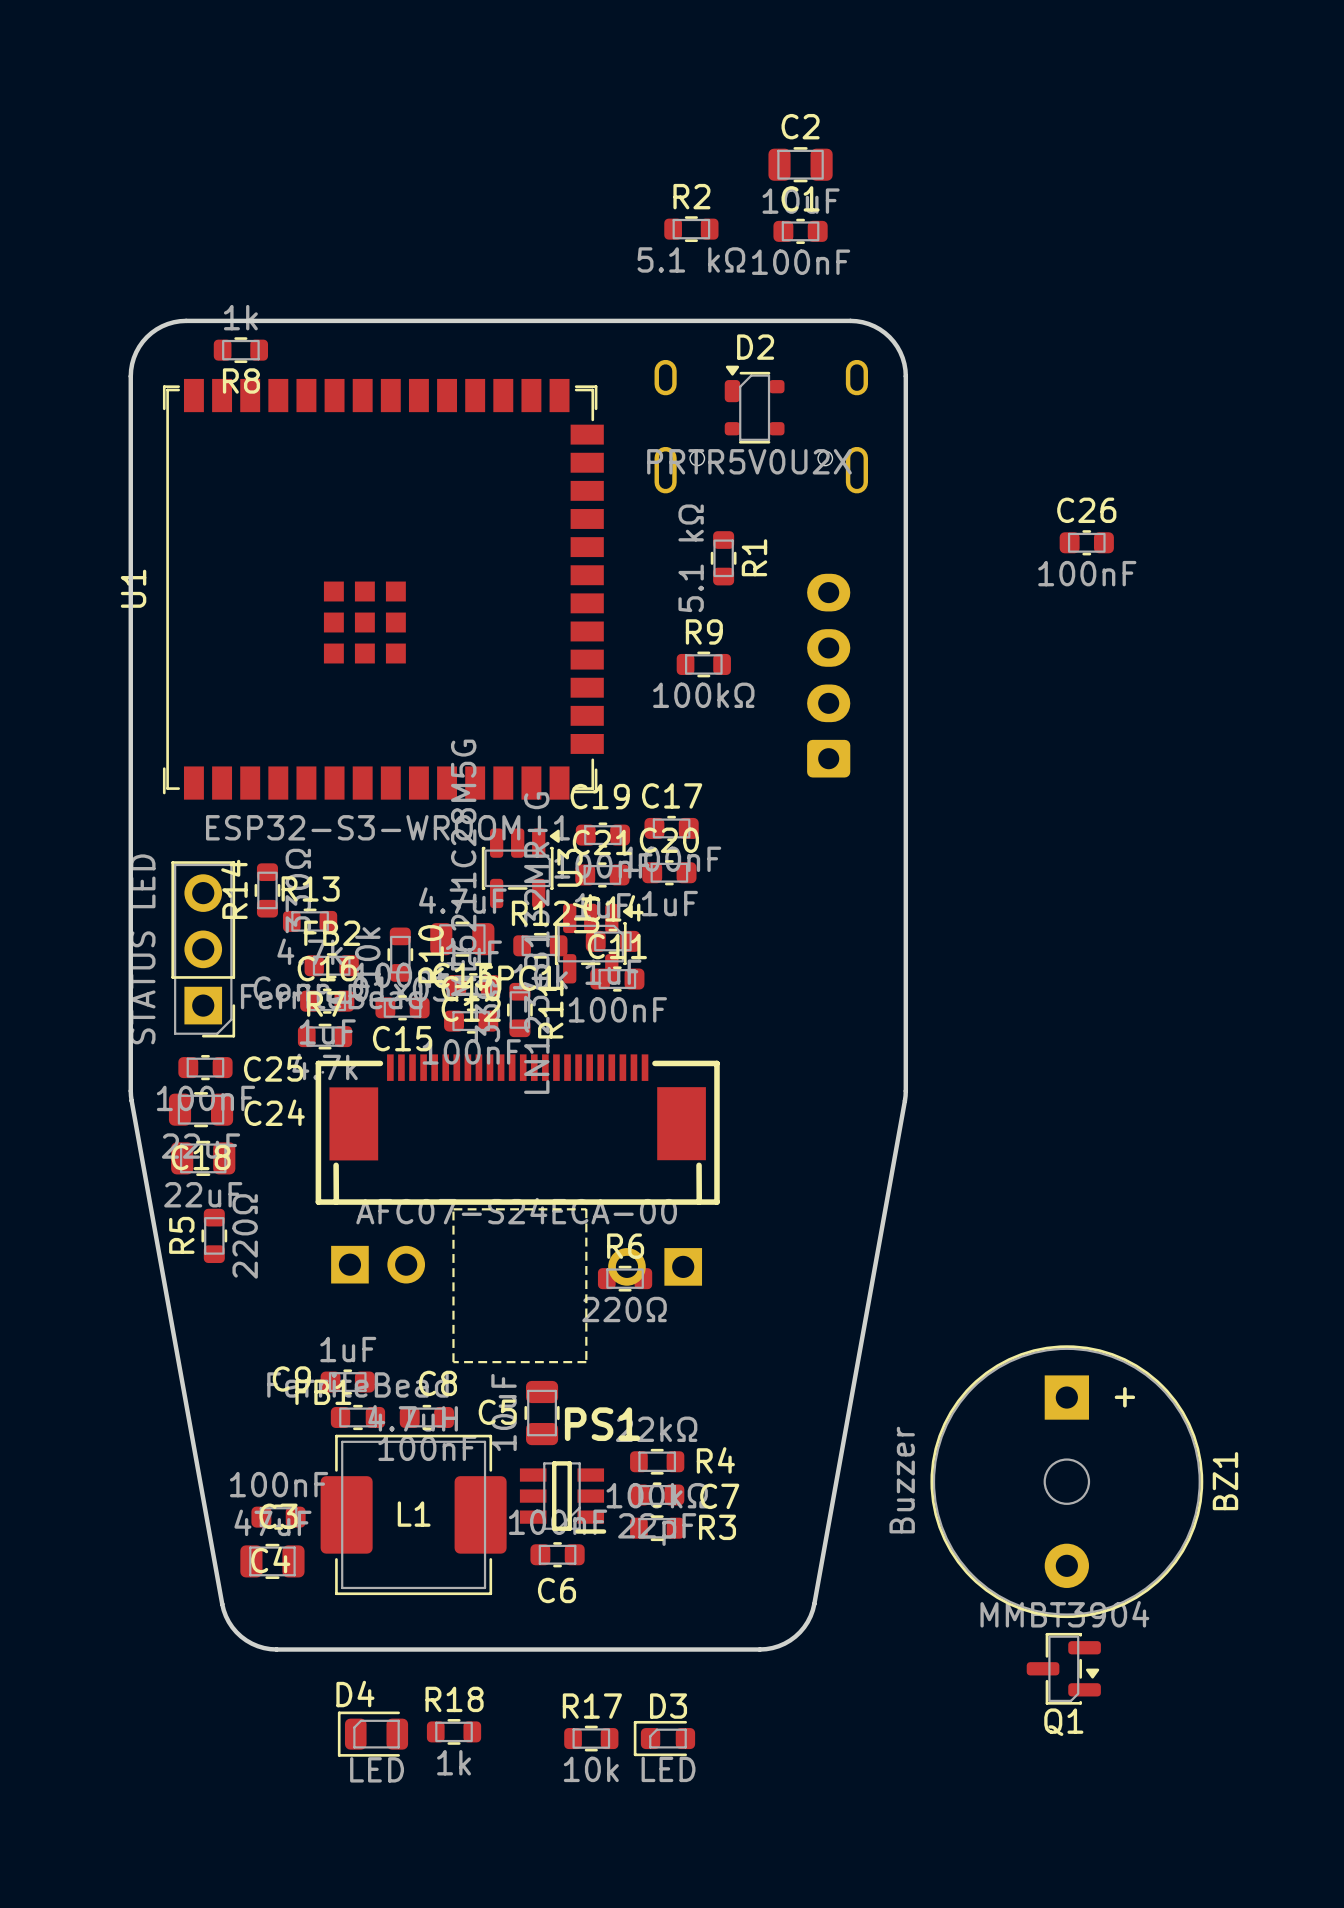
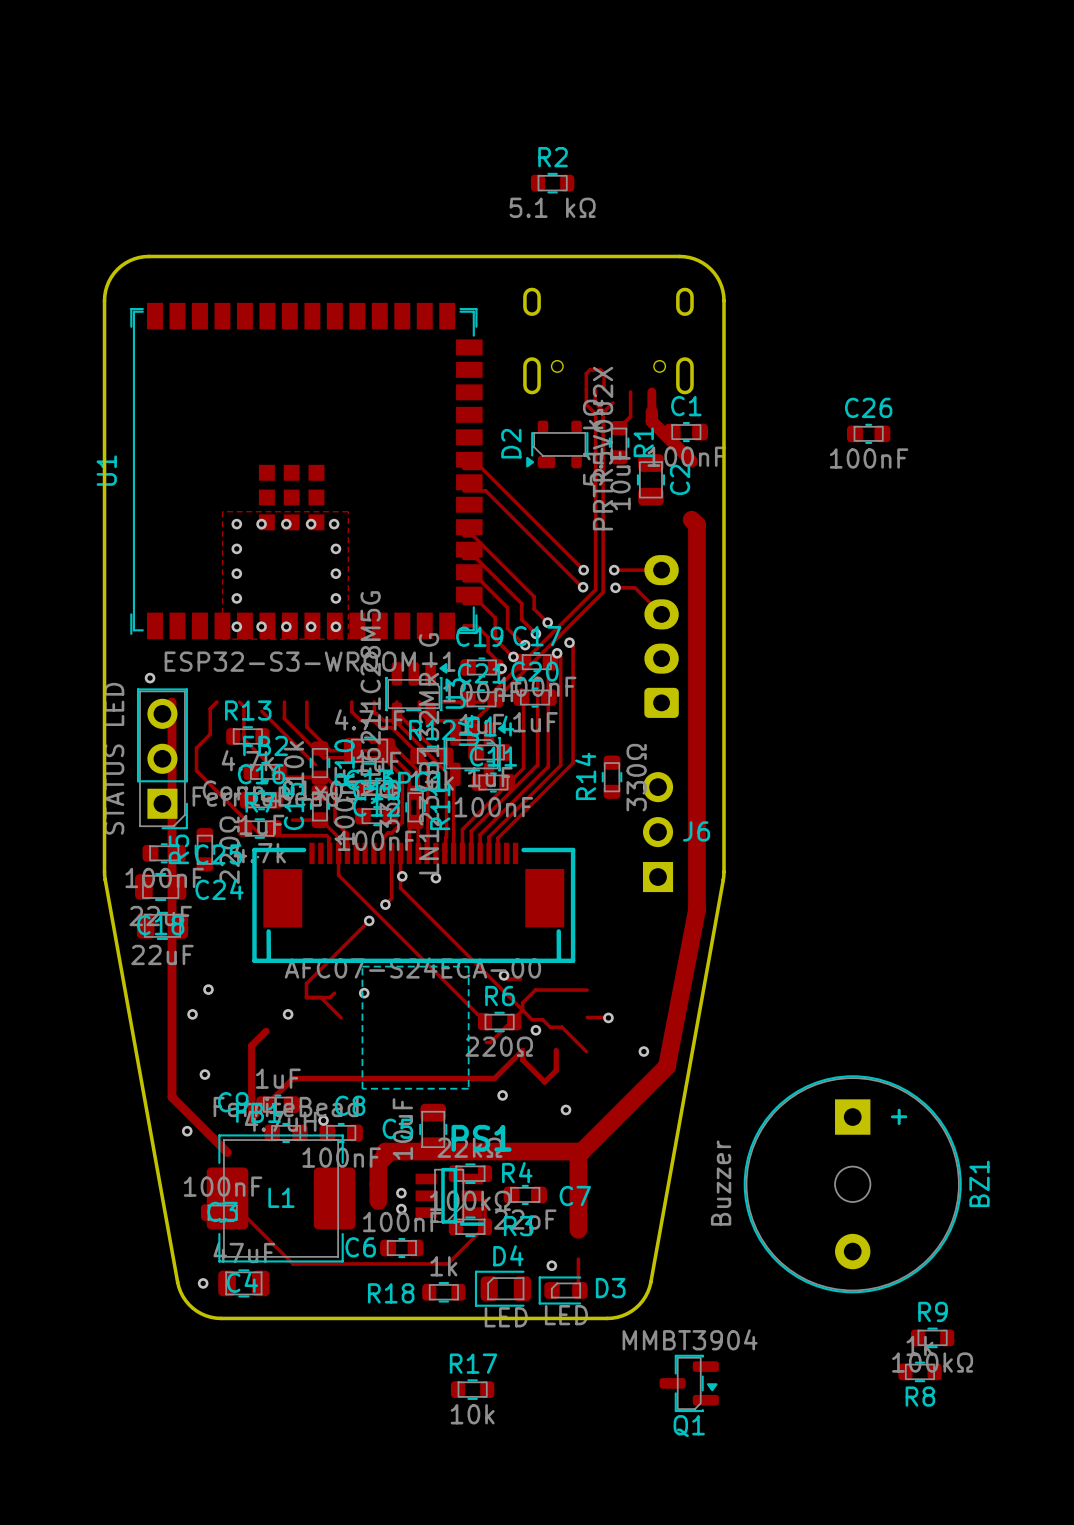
C2 rotation: 0° (800, 164) -> 90° clockwise (650, 479)
C2 position: (800, 164) -> (650, 479)
C1 position: (800, 231) -> (686, 432)
R8 position: (240, 350) -> (919, 1371)
D2 rotation: 0° (754, 404) -> 90° counterclockwise (557, 444)
D2 position: (754, 404) -> (557, 444)
track: none -> (595, 389) (595, 402) (603, 410) (603, 592) (474, 720) (428, 720) (419, 711) (419, 701)
track: none -> (604, 389) (604, 373) (600, 370) (589, 370) (586, 373) (586, 404) (595, 413) (595, 589) (483, 701) (441, 701)
track: none -> (630, 391) (630, 416) (619, 428)
track: none -> (651, 391) (651, 421) (691, 461)
track: none -> (612, 402) (605, 410)
R1 position: (723, 558) -> (619, 442)
track: none -> (463, 468) (482, 468) (583, 570)
track: none -> (463, 490) (485, 490) (583, 587)
zone outline: none -> (222, 511) (348, 511) (348, 639) (222, 639) (222, 511)
track: none -> (691, 519) (696, 525) (696, 909) (666, 1066) (578, 1155) (578, 1229)
via: none -> (236, 524)
via: none -> (261, 524)
via: none -> (286, 524)
via: none -> (311, 524)
via: none -> (334, 524)
R9 position: (703, 664) -> (932, 1337)
track: none -> (463, 535) (473, 535) (534, 596) (534, 609) (547, 622)
part position: (828, 675) -> (661, 636)
via: none -> (236, 548)
via: none -> (335, 548)
track: none -> (463, 558) (476, 558) (521, 603) (521, 619) (535, 633)
via: none -> (583, 570)
track: none -> (614, 570) (661, 570)
via: none -> (614, 570)
via: none -> (236, 573)
via: none -> (335, 573)
track: none -> (463, 580) (480, 580) (507, 607) (507, 628) (525, 645)
via: none -> (583, 587)
track: none -> (615, 587) (635, 587) (661, 614)
via: none -> (615, 587)
via: none -> (236, 598)
via: none -> (335, 598)
track: none -> (463, 603) (480, 603) (495, 617) (495, 639) (513, 656)
via: none -> (547, 622)
track: none -> (463, 625) (476, 625) (488, 637) (488, 651) (501, 665) (501, 668)
via: none -> (236, 626)
via: none -> (261, 626)
via: none -> (286, 626)
via: none -> (311, 626)
via: none -> (335, 626)
via: none -> (535, 633)
track: none -> (569, 642) (573, 646) (573, 763) (497, 838) (497, 853)
via: none -> (569, 642)
via: none -> (525, 645)
track: none -> (557, 653) (560, 656) (560, 765) (489, 837) (489, 853)
via: none -> (557, 653)
via: none -> (513, 656)
via: none -> (501, 668)
track: none -> (548, 668) (548, 766) (480, 834) (480, 853)
via: none -> (150, 678)
track: none -> (536, 677) (537, 764) (471, 831) (471, 853)
track: none -> (521, 689) (523, 691) (523, 768) (462, 829) (462, 853)
track: none -> (172, 701) (172, 1097) (227, 1152)
track: none -> (216, 701) (210, 708) (210, 734) (196, 748) (196, 770) (261, 835) (326, 835) (328, 837) (329, 853)
track: none -> (239, 701) (243, 706) (243, 739) (281, 777) (326, 777) (335, 786) (335, 821) (347, 833) (347, 853)
track: none -> (284, 701) (284, 718) (323, 757) (383, 757) (402, 776) (402, 822) (382, 838) (382, 853)
track: none -> (306, 701) (306, 727) (330, 750) (386, 750) (409, 773) (409, 853)
track: none -> (351, 701) (351, 711) (360, 720) (373, 720) (380, 727) (391, 727) (427, 763) (427, 853)
track: none -> (374, 701) (374, 713) (383, 720) (394, 720) (446, 772) (444, 853)
track: none -> (396, 701) (396, 712) (453, 769) (453, 853)
R14 position: (267, 890) -> (612, 777)
track: none -> (261, 711) (315, 764)
track: none -> (366, 736) (371, 741) (389, 741) (418, 771) (418, 853)
C15 rotation: 0° (402, 1007) -> 90° clockwise (319, 806)
track: none -> (292, 820) (321, 820) (338, 837) (338, 875) (477, 1014) (486, 1014)
J6: none -> (658, 832)
track: none -> (391, 853) (391, 898) (385, 904)
track: none -> (400, 853) (400, 888) (532, 1019) (542, 1019) (550, 1027) (562, 1027) (586, 1051)
via: none -> (402, 876)
via: none -> (435, 878)
via: none -> (385, 904)
track: none -> (369, 920) (306, 983) (306, 997) (330, 997) (334, 993)
via: none -> (369, 920)
track: none -> (504, 975) (507, 978) (520, 978)
via: none -> (504, 975)
R5 position: (214, 1235) -> (204, 849)
via: none -> (208, 989)
track: none -> (587, 990) (535, 990) (522, 1002) (522, 1010) (490, 1042) (486, 1042)
via: none -> (364, 993)
track: none -> (320, 997) (341, 1017)
part: (378, 1264) -> none
part: (655, 1266) -> none
via: none -> (192, 1014)
via: none -> (288, 1014)
track: none -> (587, 1017) (608, 1017)
via: none -> (608, 1017)
via: none -> (535, 1030)
track: none -> (266, 1031) (251, 1045) (251, 1119) (293, 1078) (494, 1078) (522, 1050) (522, 1059) (544, 1082) (556, 1070) (556, 1050)
via: none -> (643, 1051)
via: none -> (204, 1074)
via: none -> (502, 1095)
via: none -> (565, 1109)
via: none -> (323, 1120)
via: none -> (187, 1131)
track: none -> (581, 1151) (385, 1151) (385, 1155) (378, 1163) (378, 1201)
R4 position: (657, 1461) -> (470, 1173)
via: none -> (401, 1193)
track: none -> (227, 1198) (292, 1263) (447, 1263) (485, 1226) (484, 1200)
via: none -> (401, 1209)
L1 position: (413, 1514) -> (281, 1198)
R3 position: (657, 1528) -> (470, 1226)
C6 position: (557, 1554) -> (401, 1248)
C4 position: (272, 1561) -> (243, 1283)
track: none -> (578, 1259) (579, 1290)
via: none -> (551, 1265)
C6 name position: C6 (556, 1590) -> C6 (360, 1247)
via: none -> (203, 1283)
Q1 position: (1063, 1668) -> (689, 1383)
D4 name position: D4 (355, 1694) -> D4 (508, 1255)
R18 name position: R18 (454, 1699) -> R18 (391, 1293)
D3 name position: D3 (668, 1706) -> D3 (610, 1288)
R18 position: (454, 1731) -> (443, 1292)
D4 position: (372, 1734) -> (502, 1288)
D3 position: (664, 1738) -> (563, 1290)
R18 value position: 1k (454, 1762) -> 1k (443, 1266)

